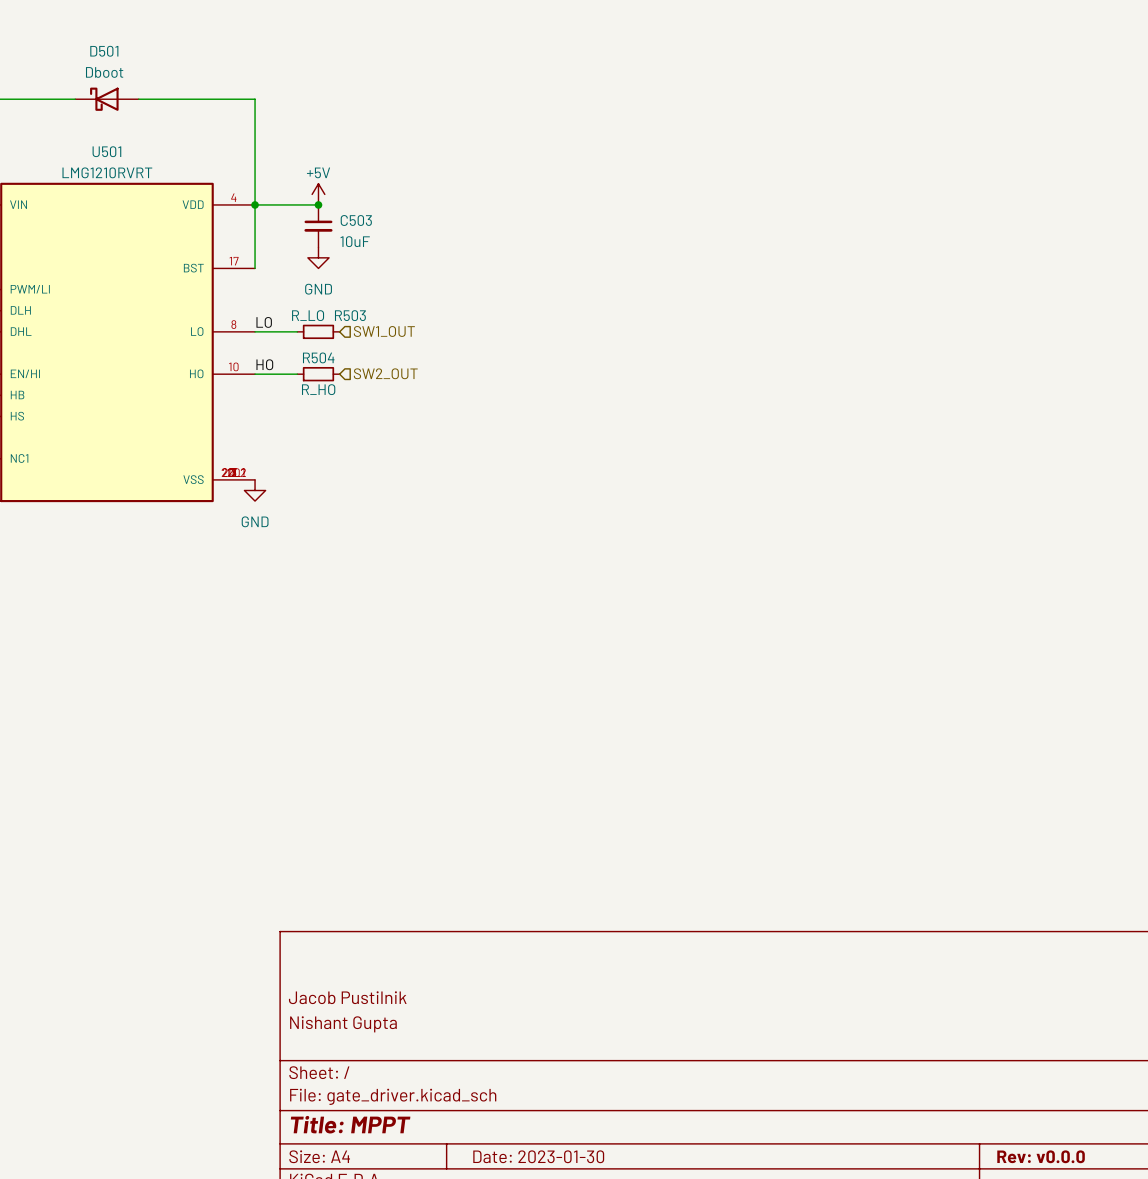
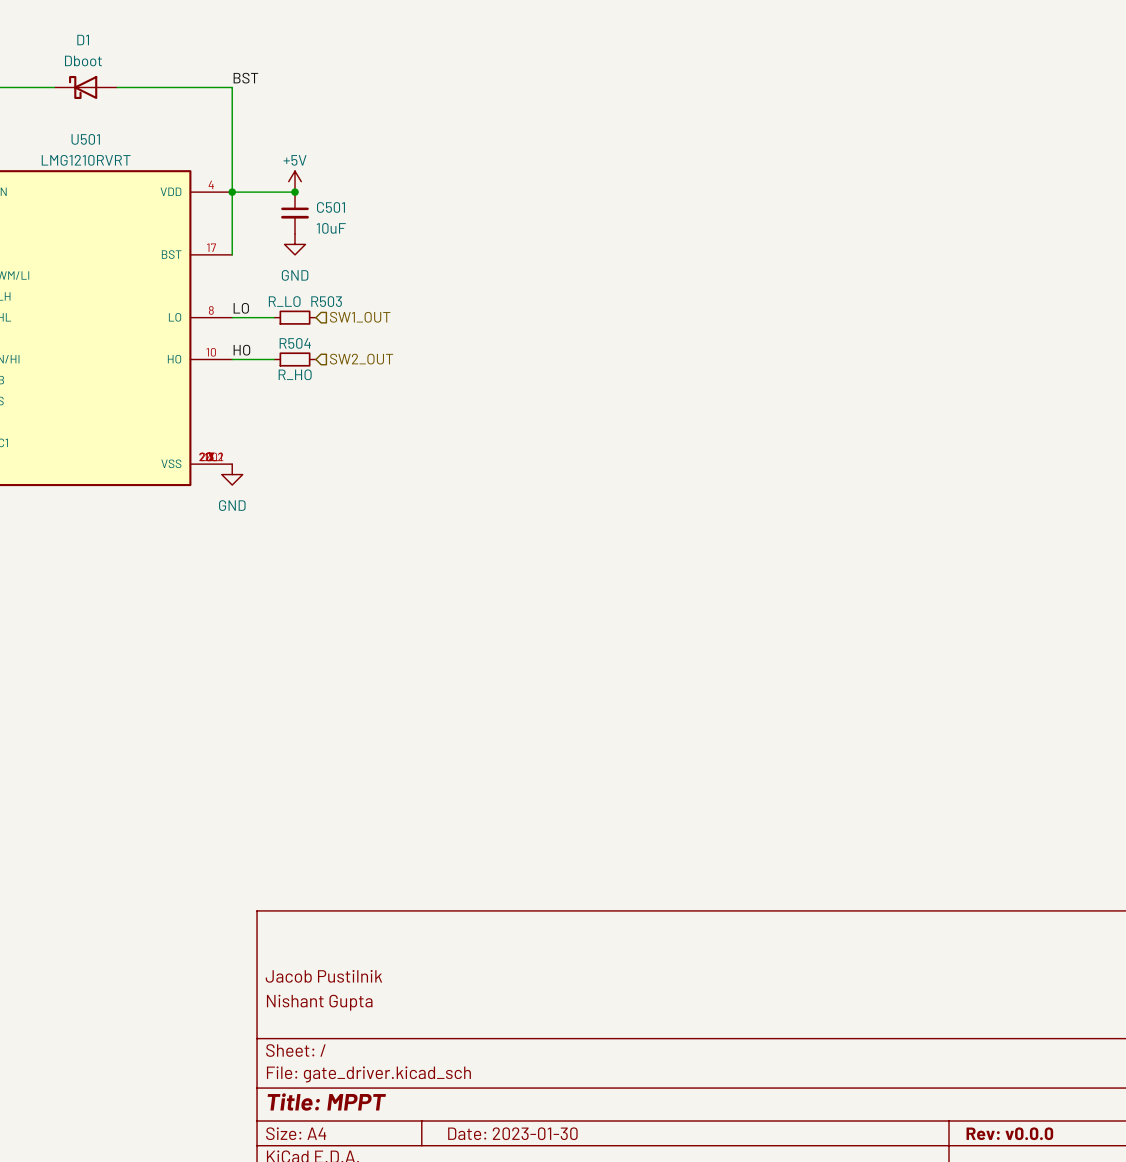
D501 name: D501 (104, 51) -> D1 (83, 40)
label: none -> BST (245, 78)
C503 name: C503 (356, 220) -> C501 (330, 207)

